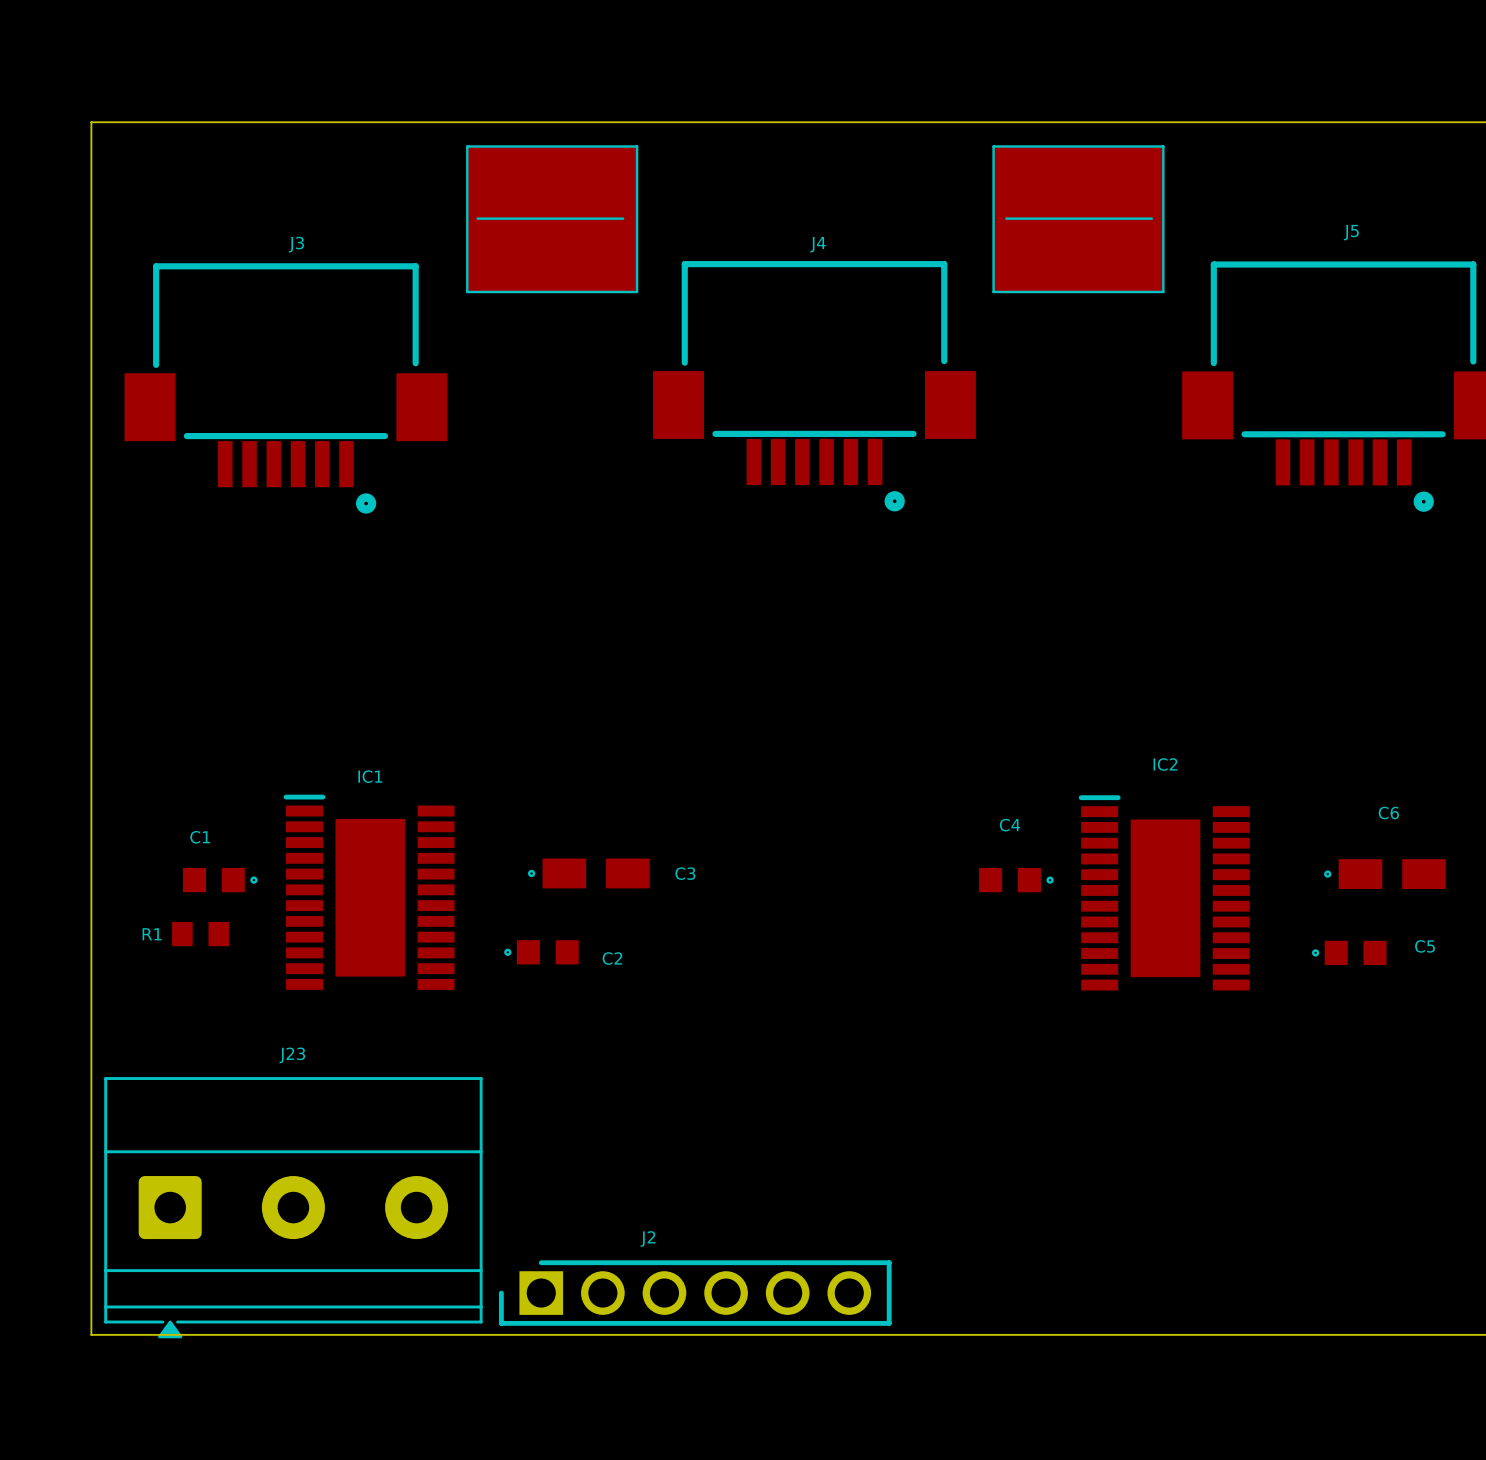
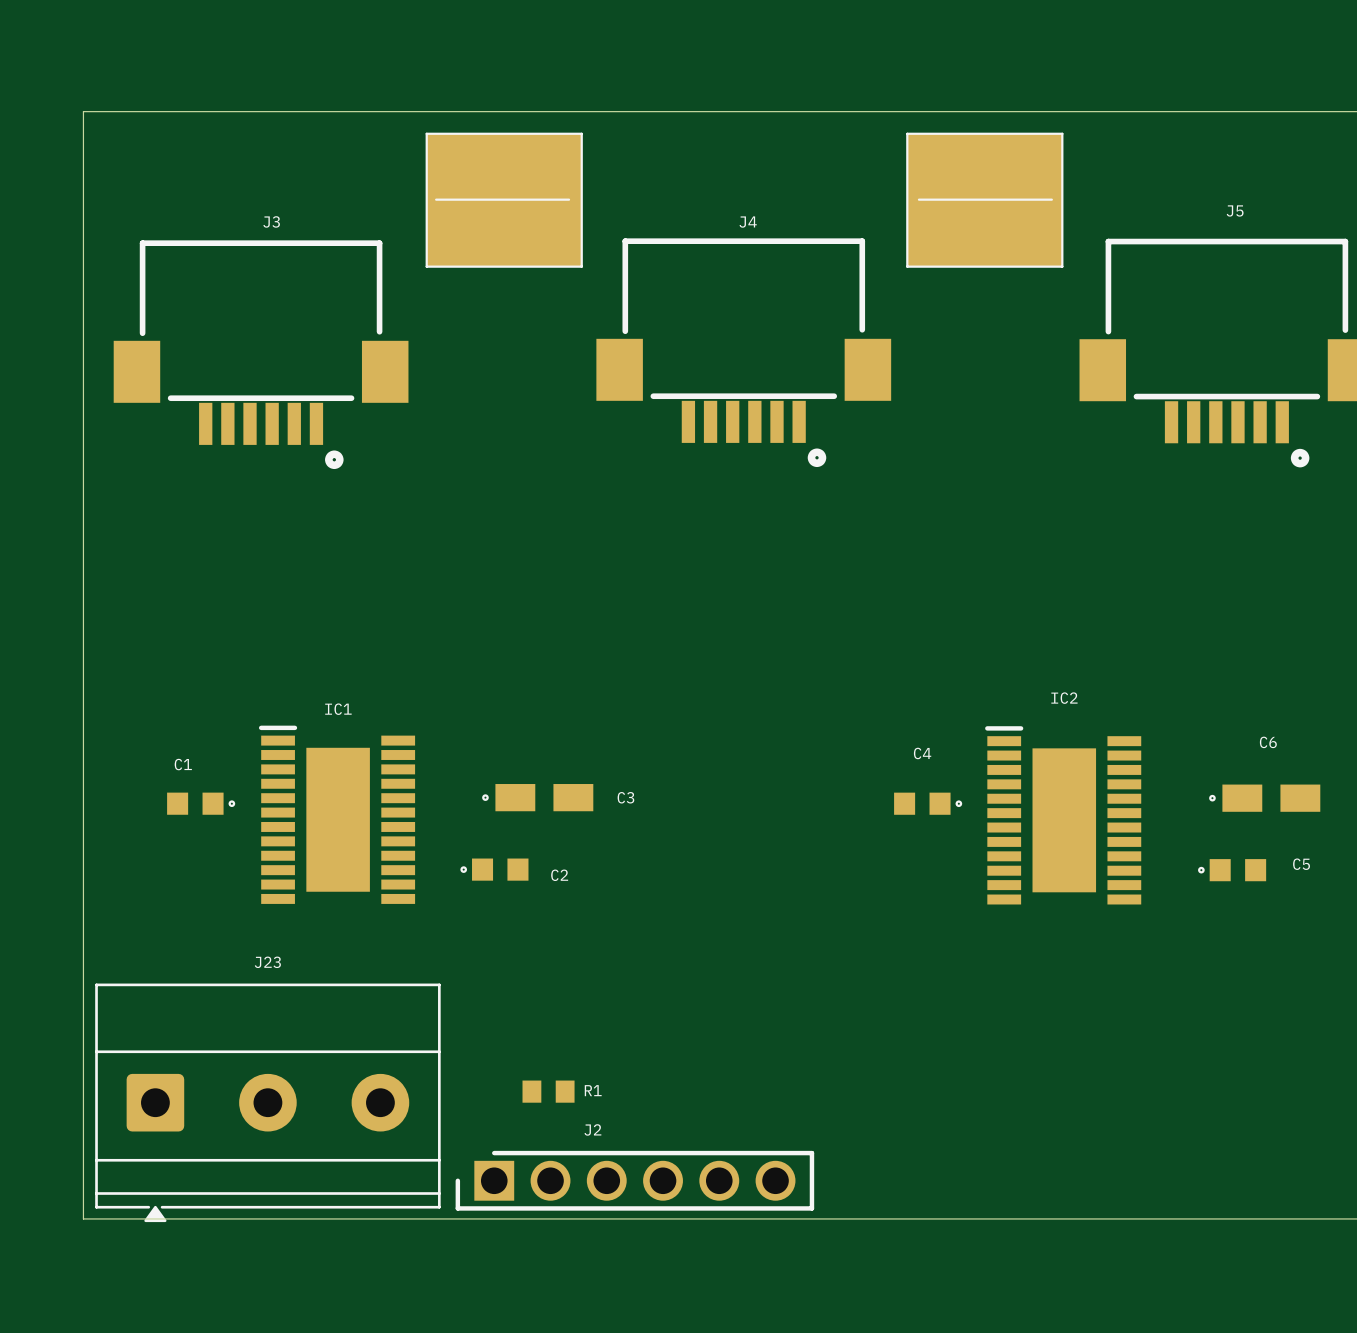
R1 name position: R1 (152, 934) -> R1 (593, 1090)
R1 position: (200, 934) -> (548, 1091)

